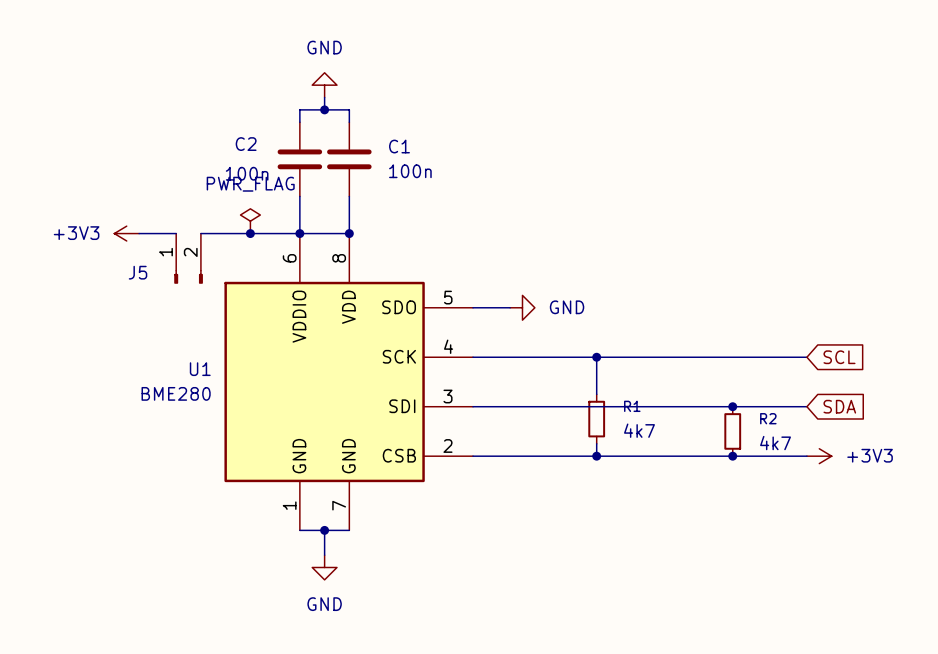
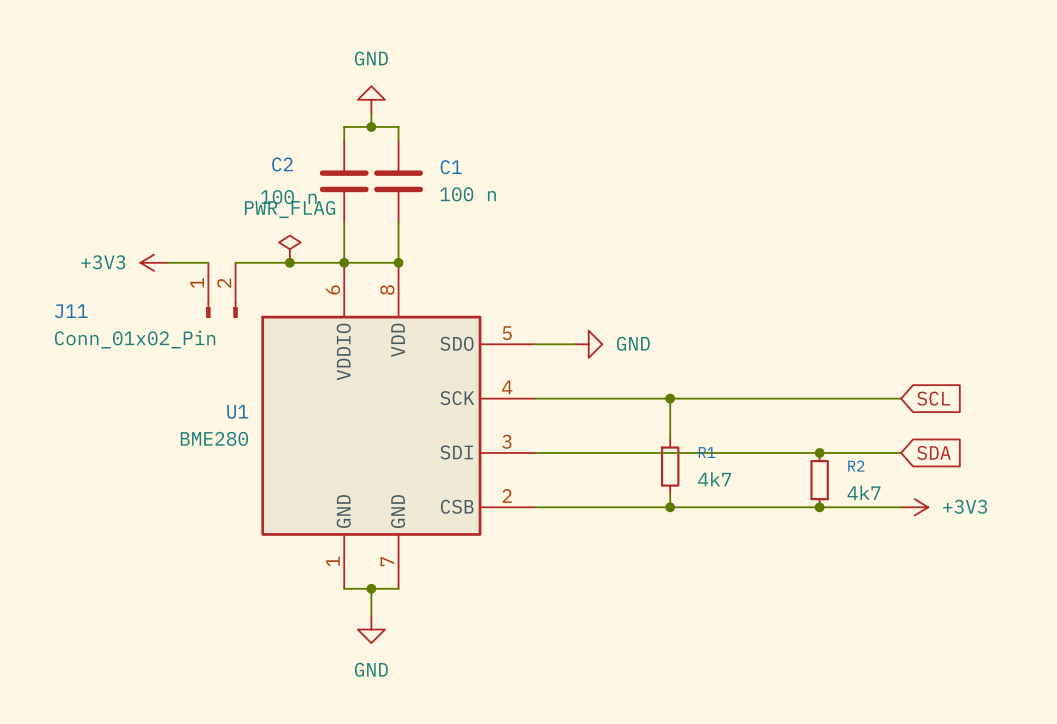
C1 value: 100n (410, 171) -> 100 n (468, 194)
C2 value: 100n (247, 173) -> 100 n (288, 197)
J5 name: J5 (138, 272) -> J11 (71, 311)
J5 value: none -> Conn_01x02_Pin (135, 339)

